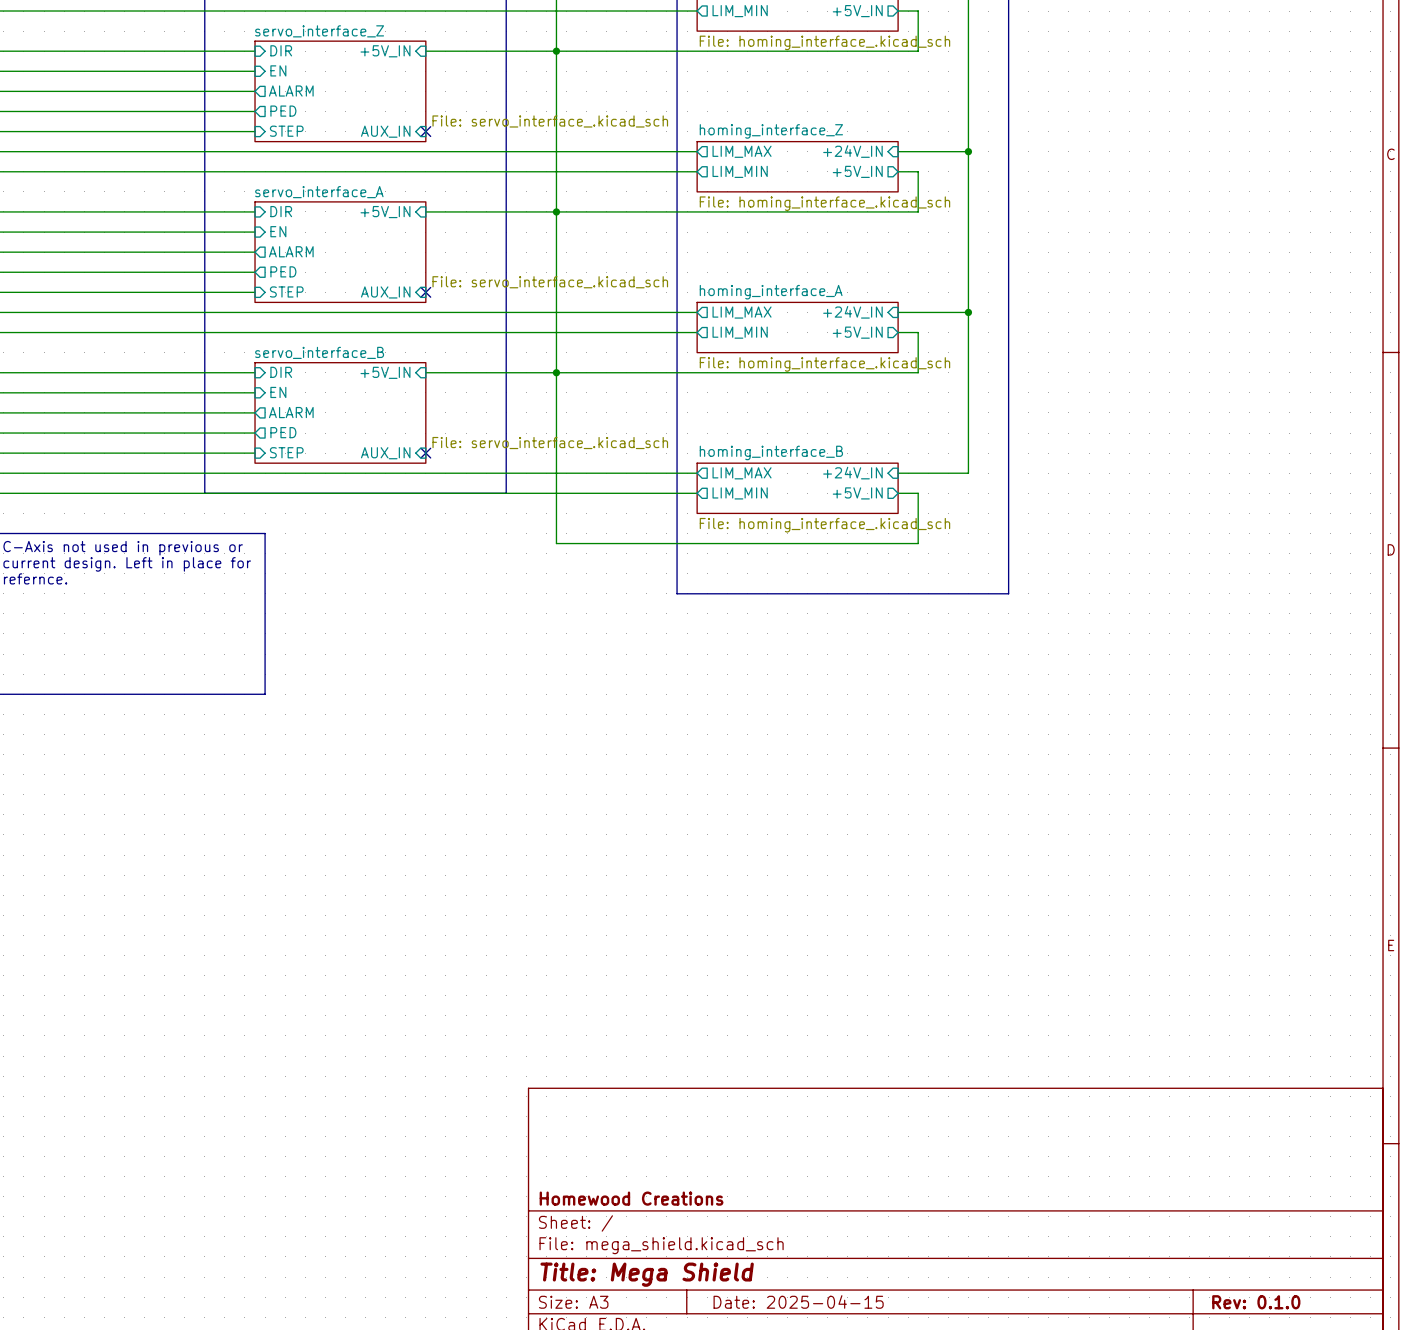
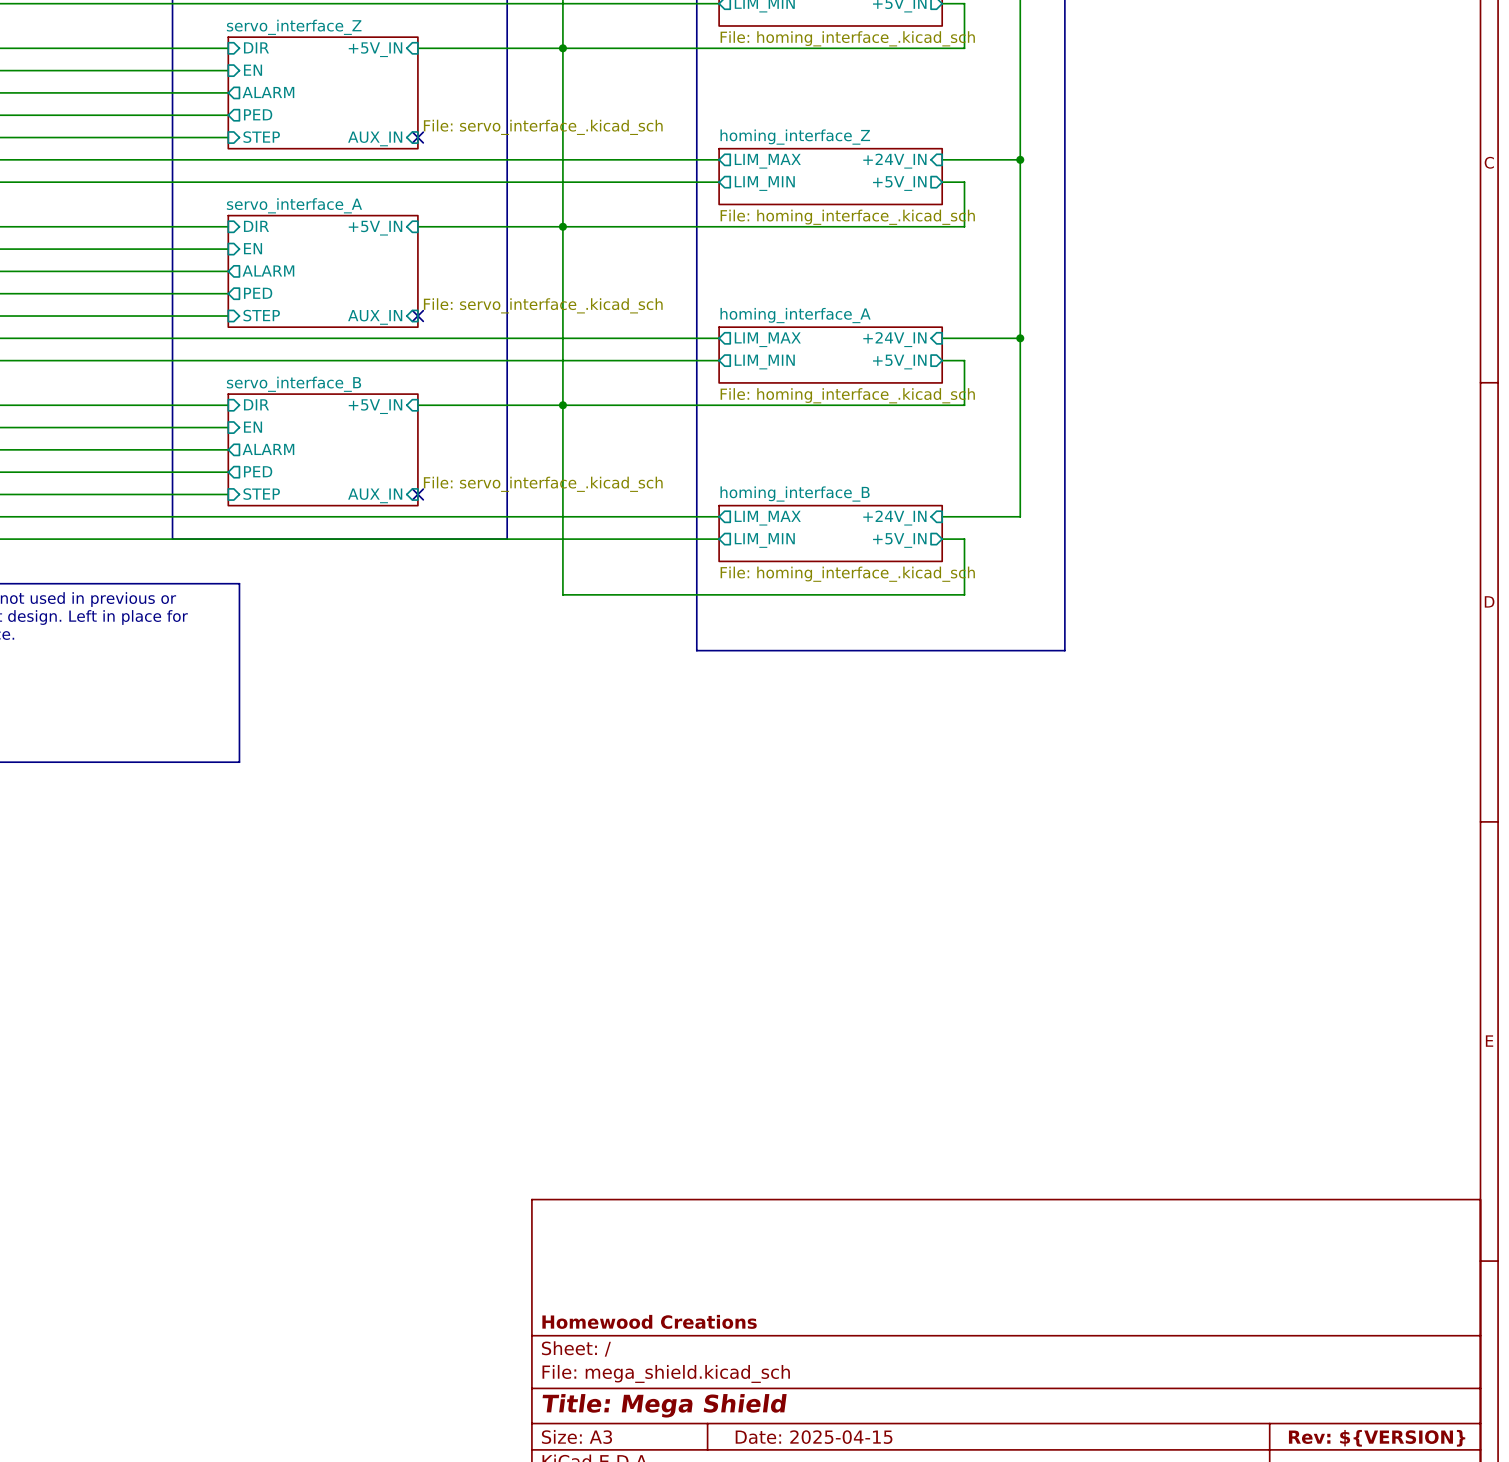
title block: Rev: 0.1.0 (1256, 1302) -> Rev: ${VERSION} (1377, 1438)

